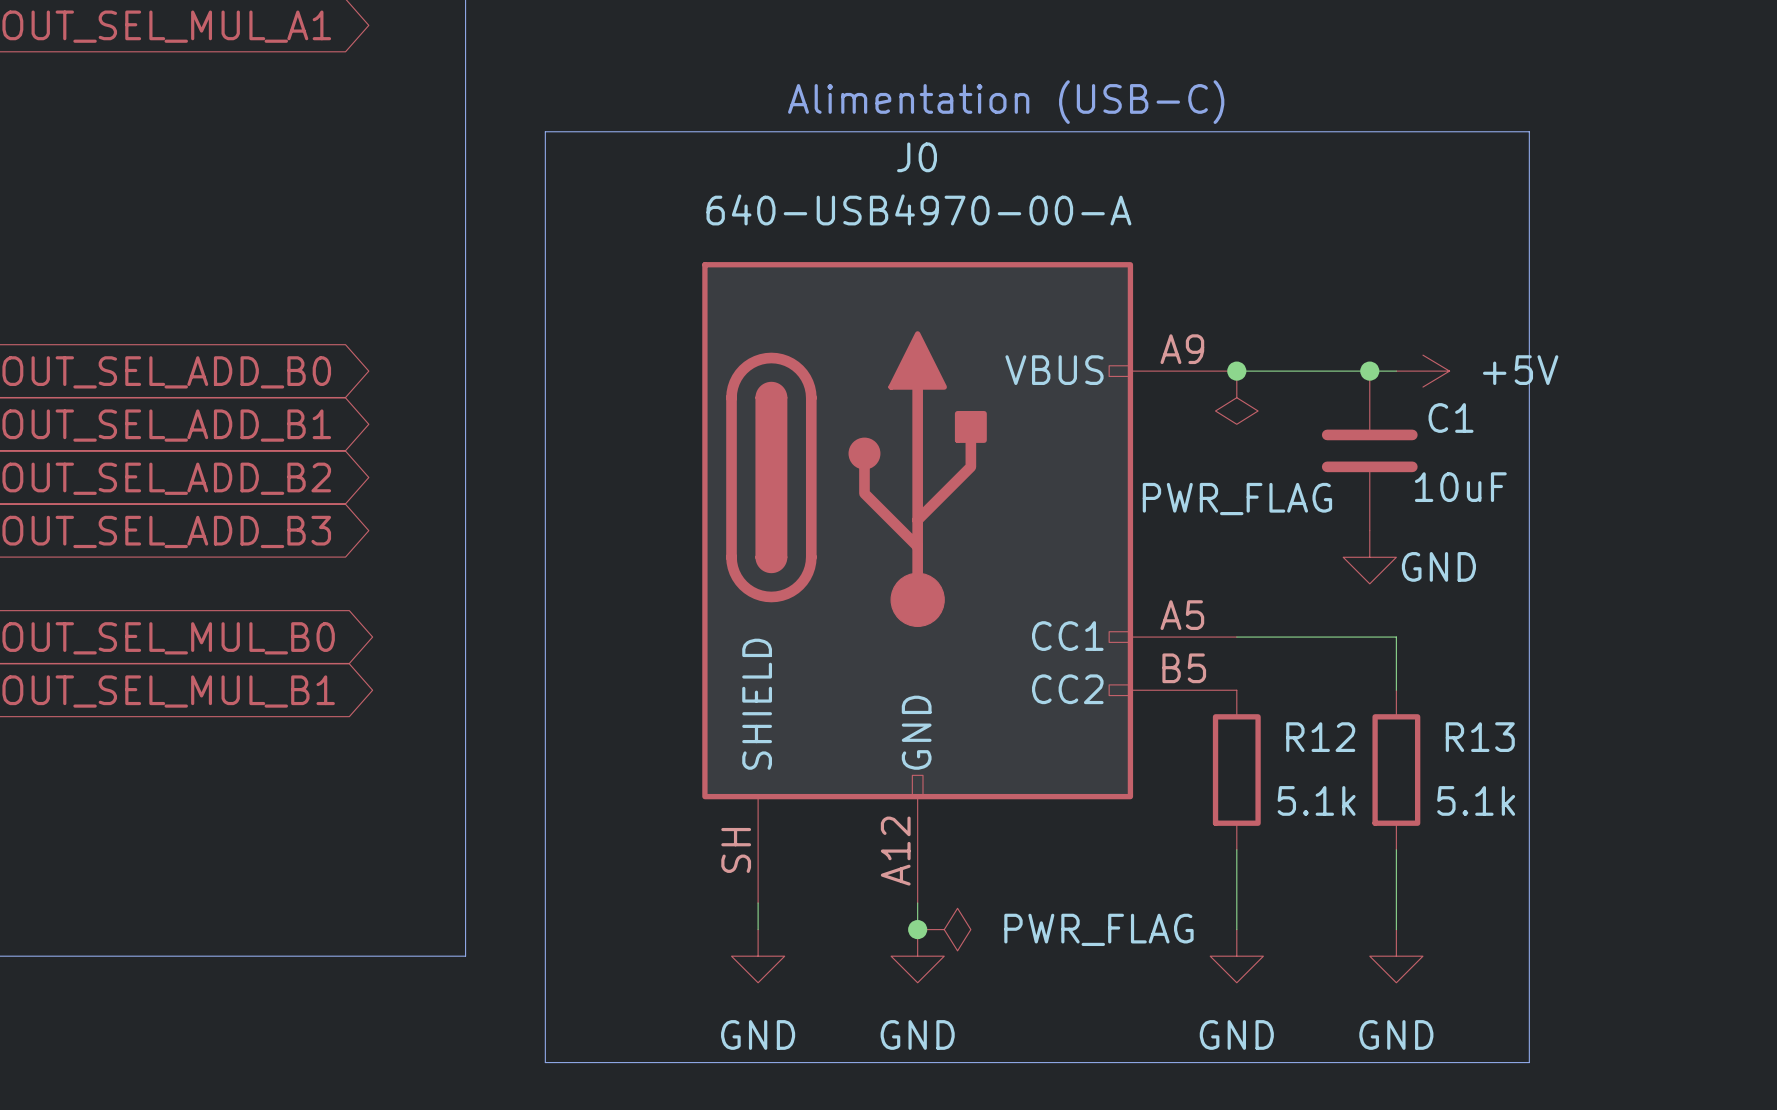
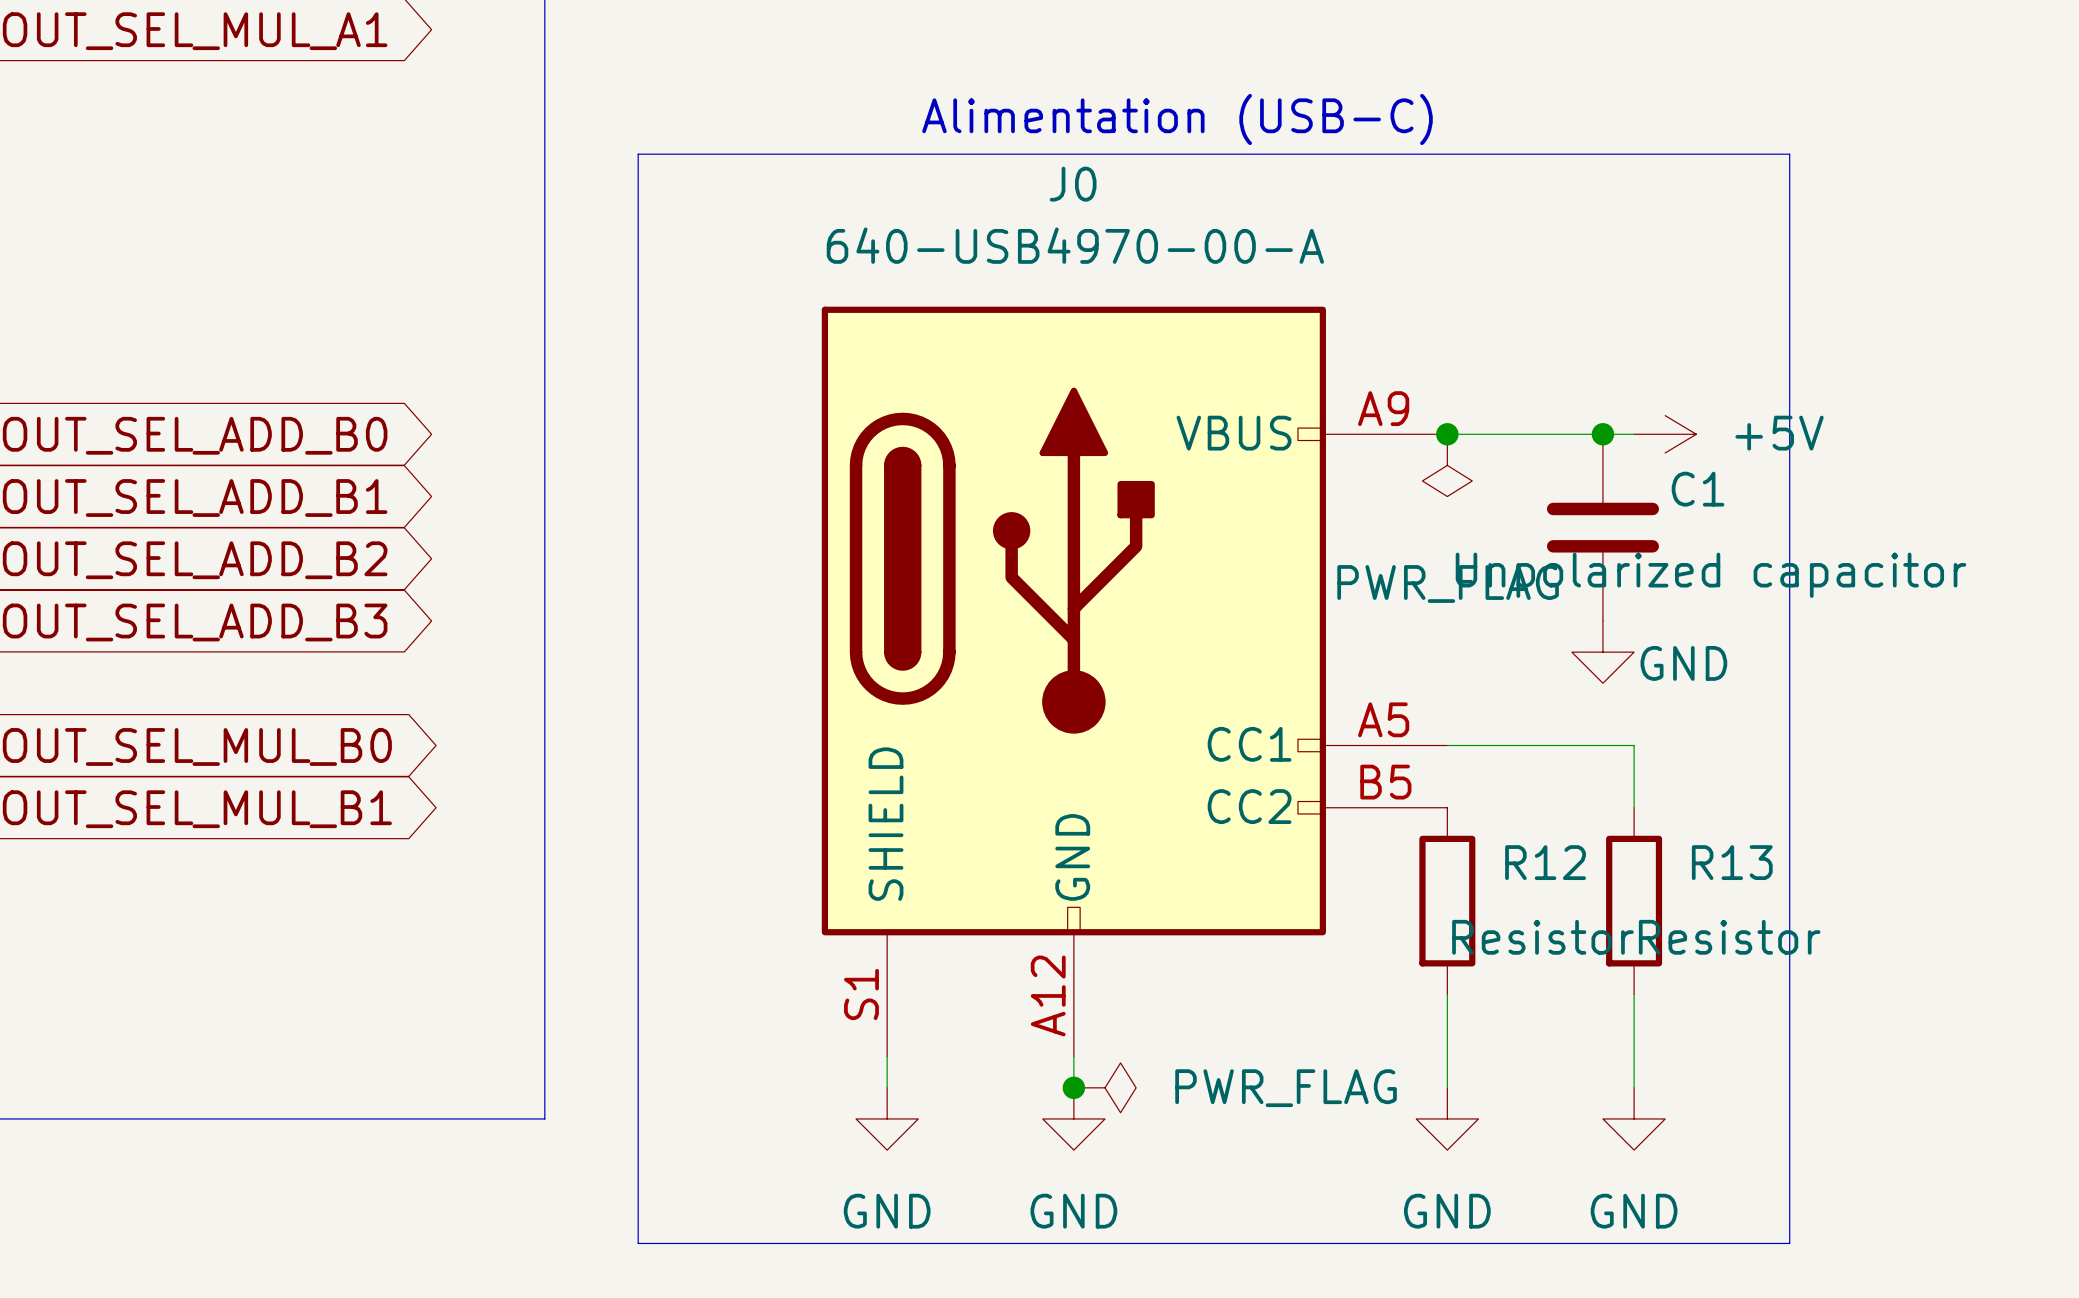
C1 text: 10uF (1460, 487) -> Unpolarized capacitor (1711, 575)
R12 text: 5.1k (1316, 800) -> Resistor (1542, 937)
R13 text: 5.1k (1476, 800) -> Resistor (1729, 937)
J0 pin number: SH (736, 850) -> S1 (861, 994)

